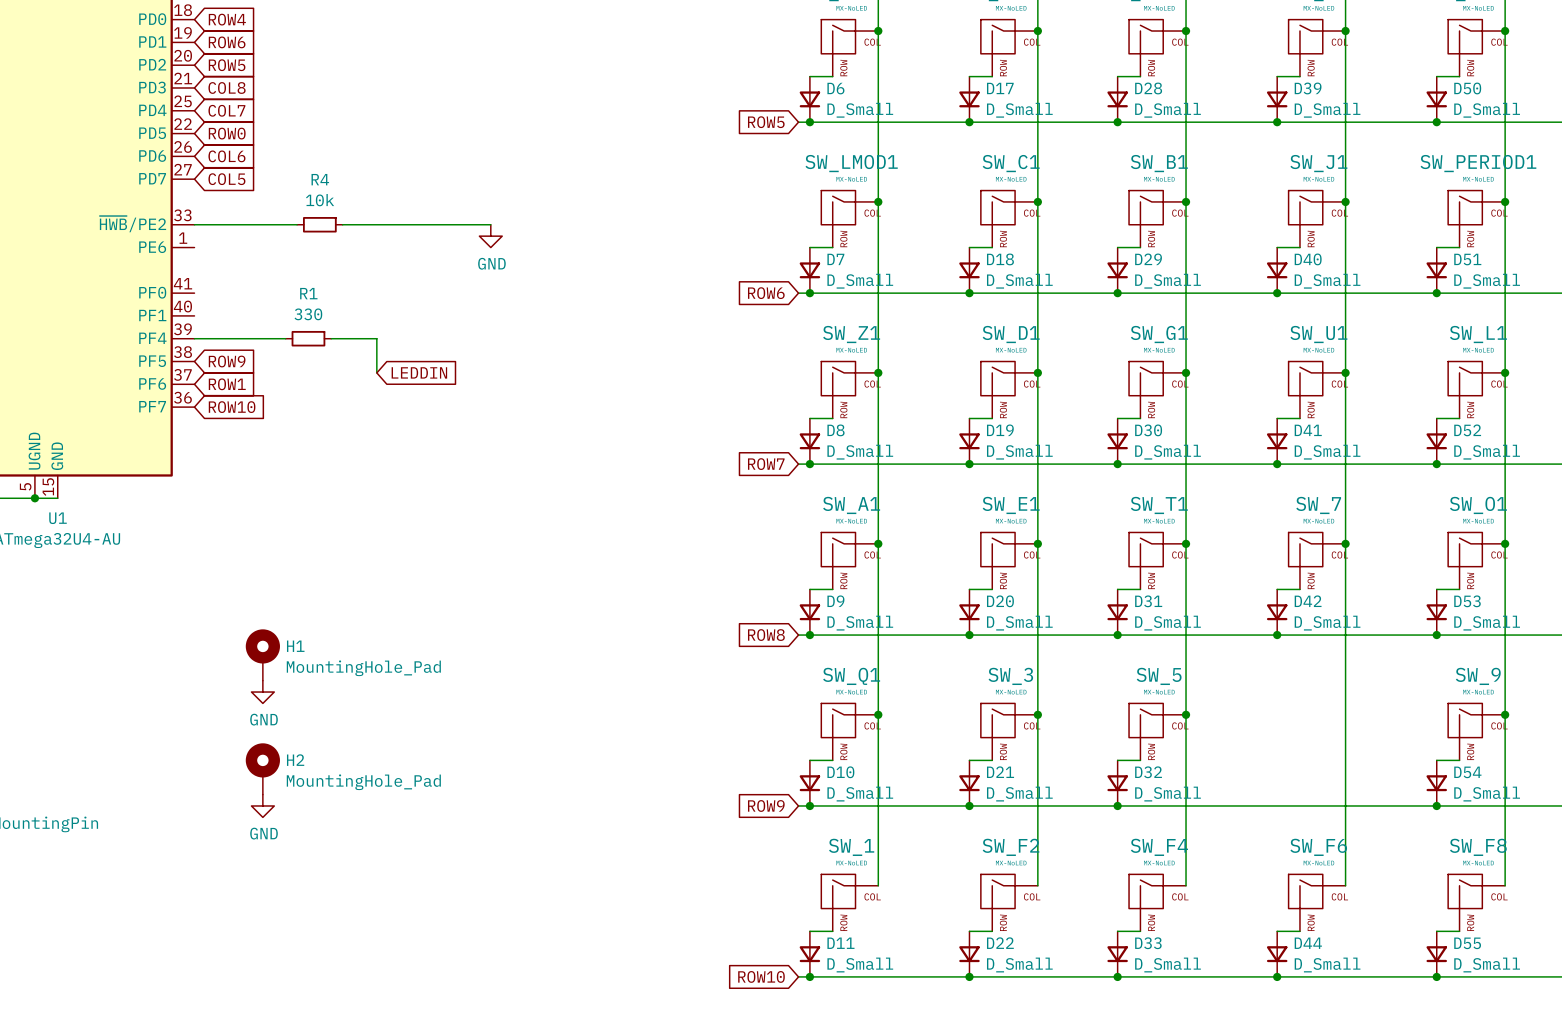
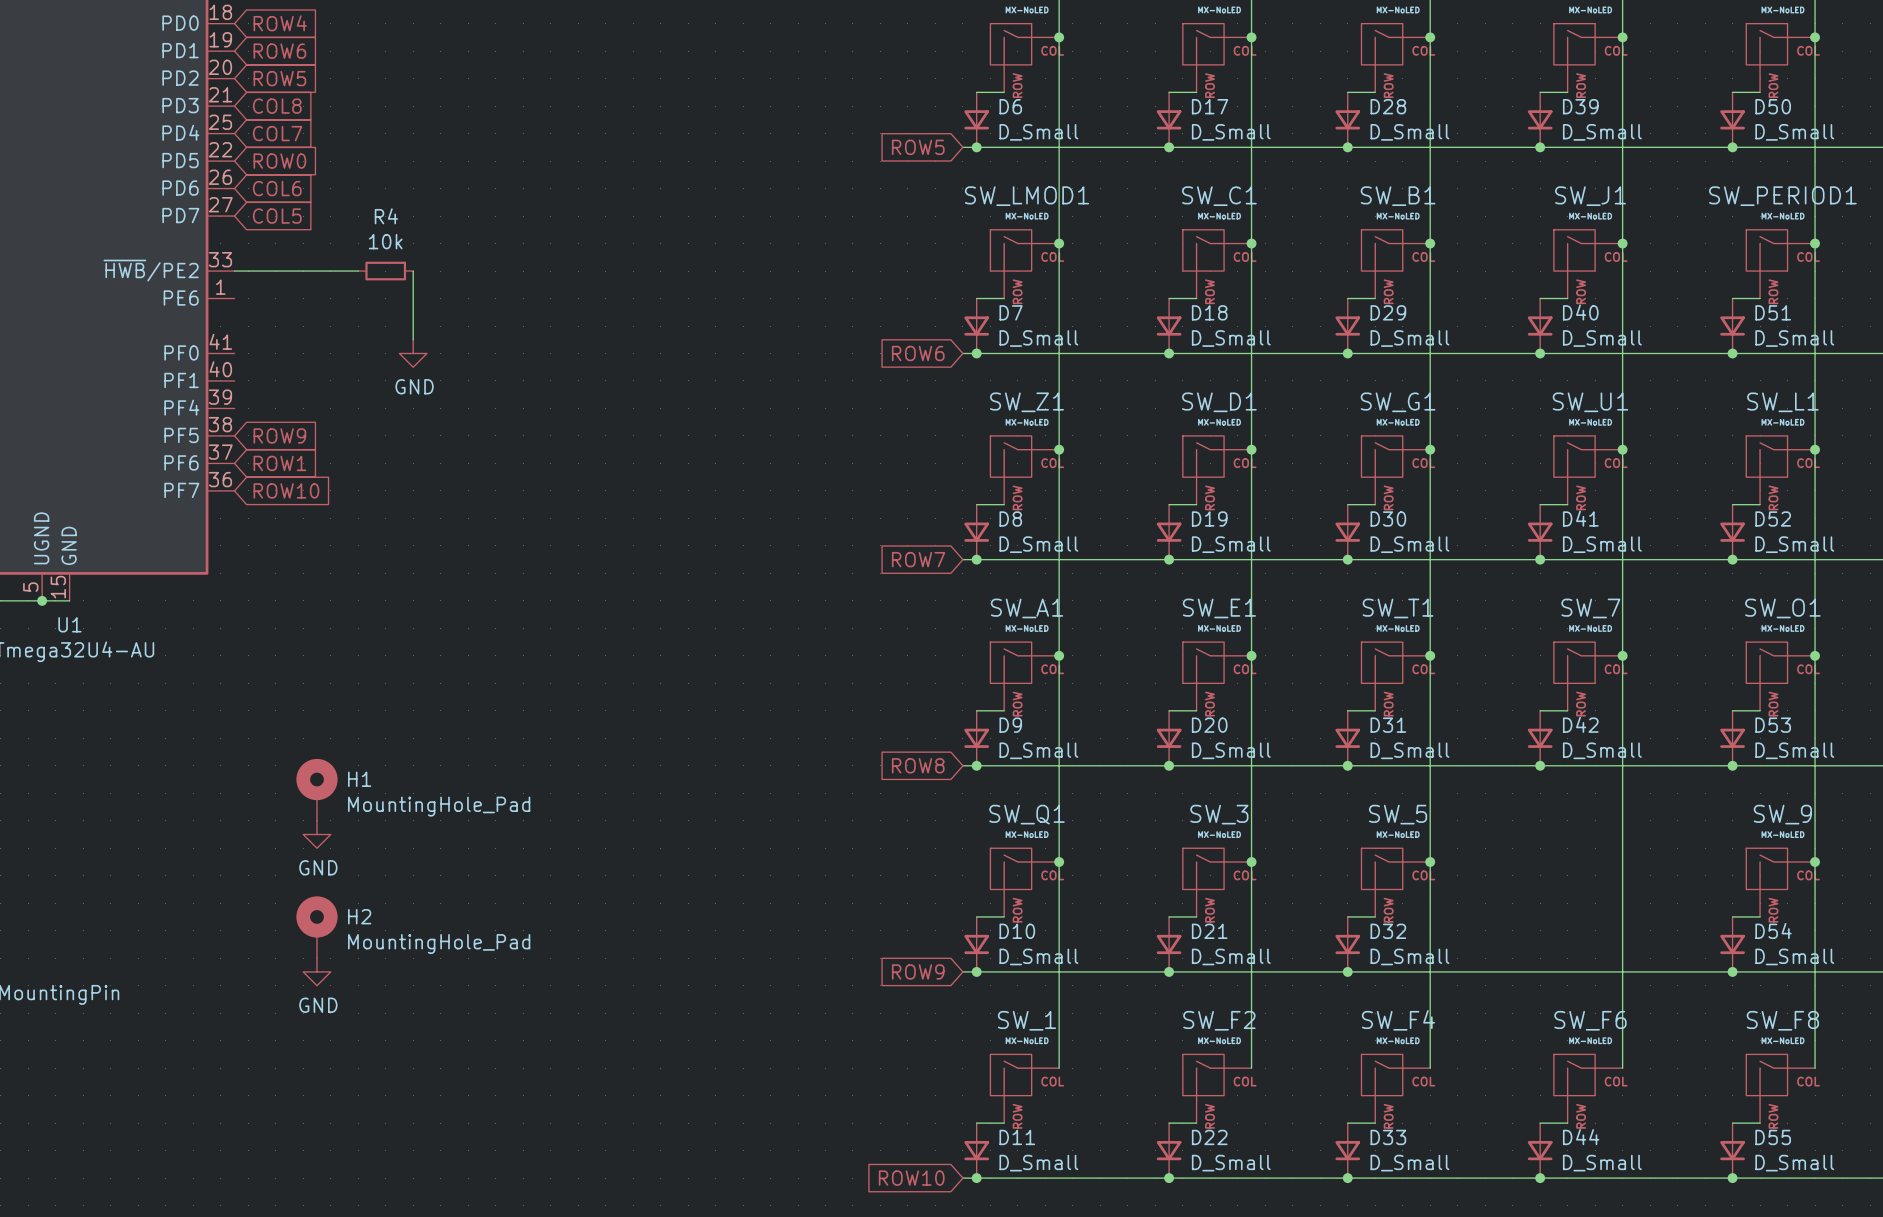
wire: (342, 224) (490, 224) -> (413, 271) (413, 339)
power symbol position: GND (490, 236) -> GND (413, 353)
wire: (194, 338) (285, 338) -> none
R1: 330 (308, 338) -> none
wire: (331, 338) (376, 338) (376, 372) -> none
global label: LEDDIN (419, 372) -> none

